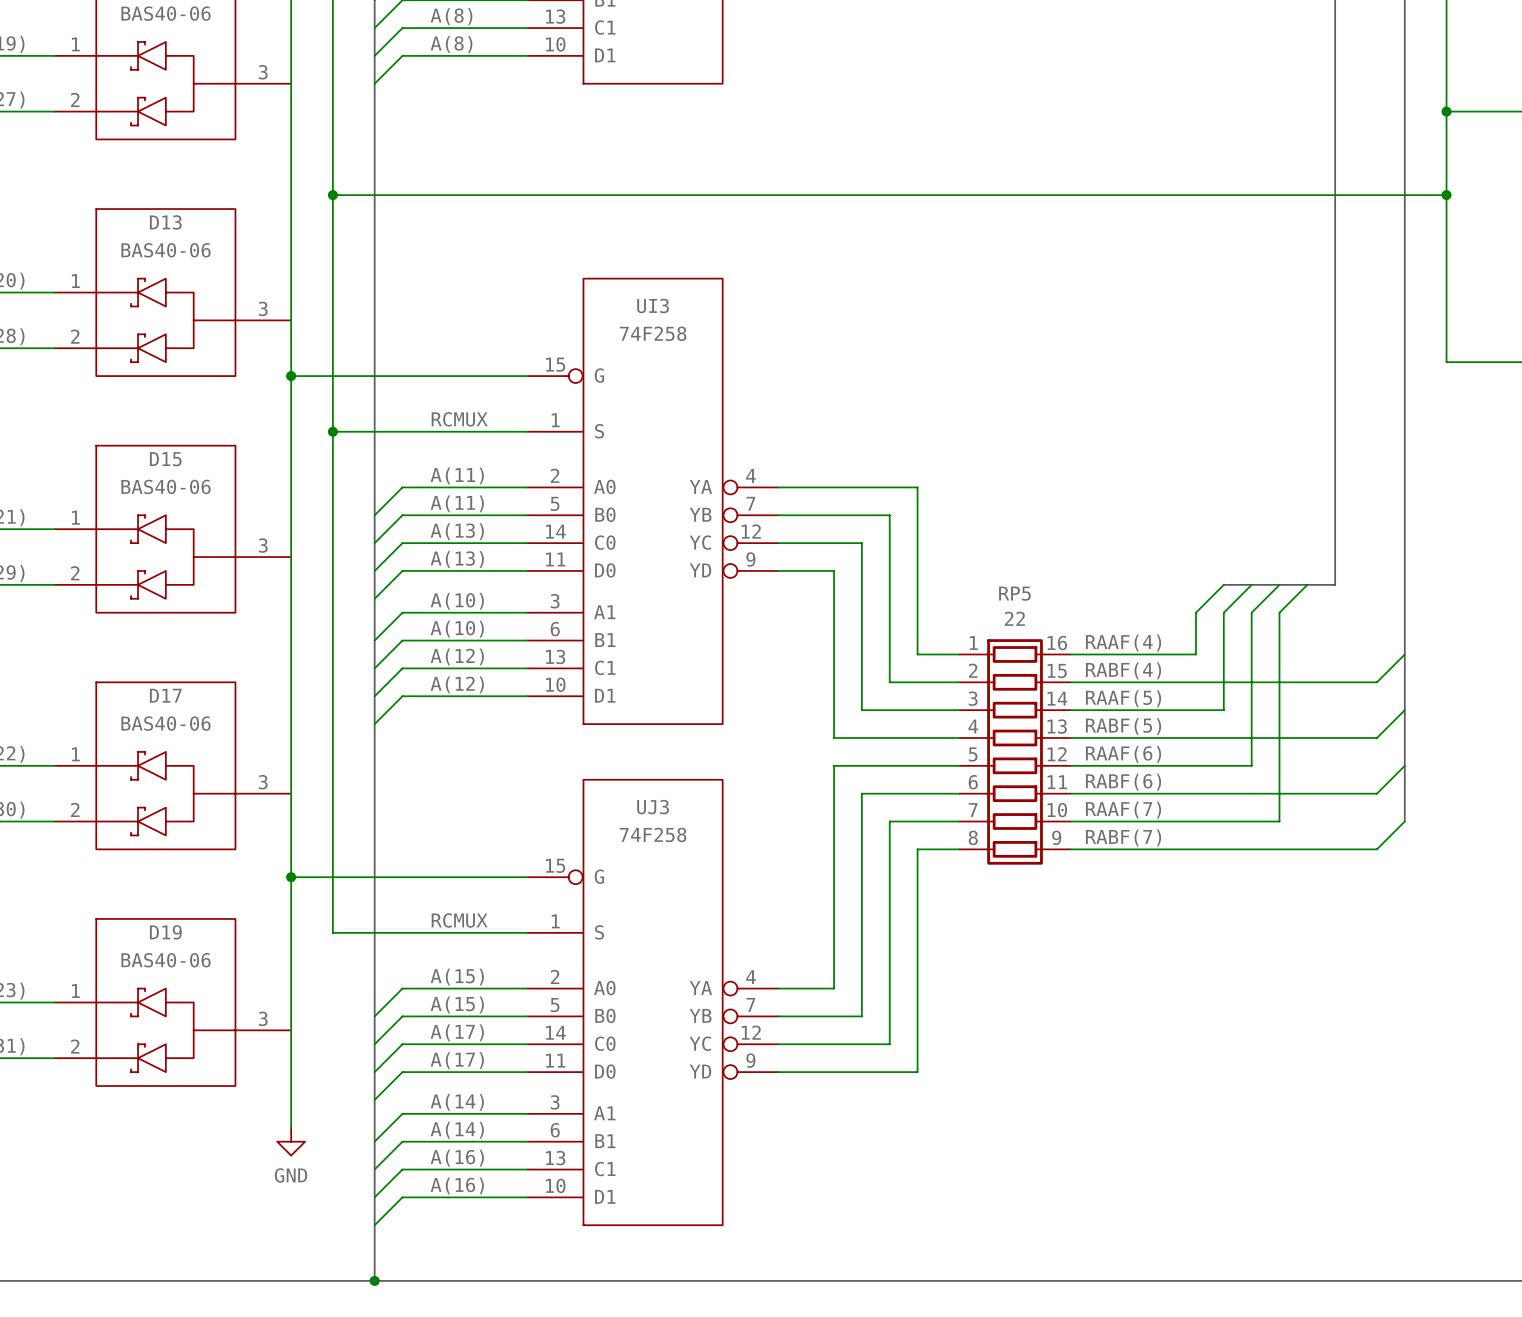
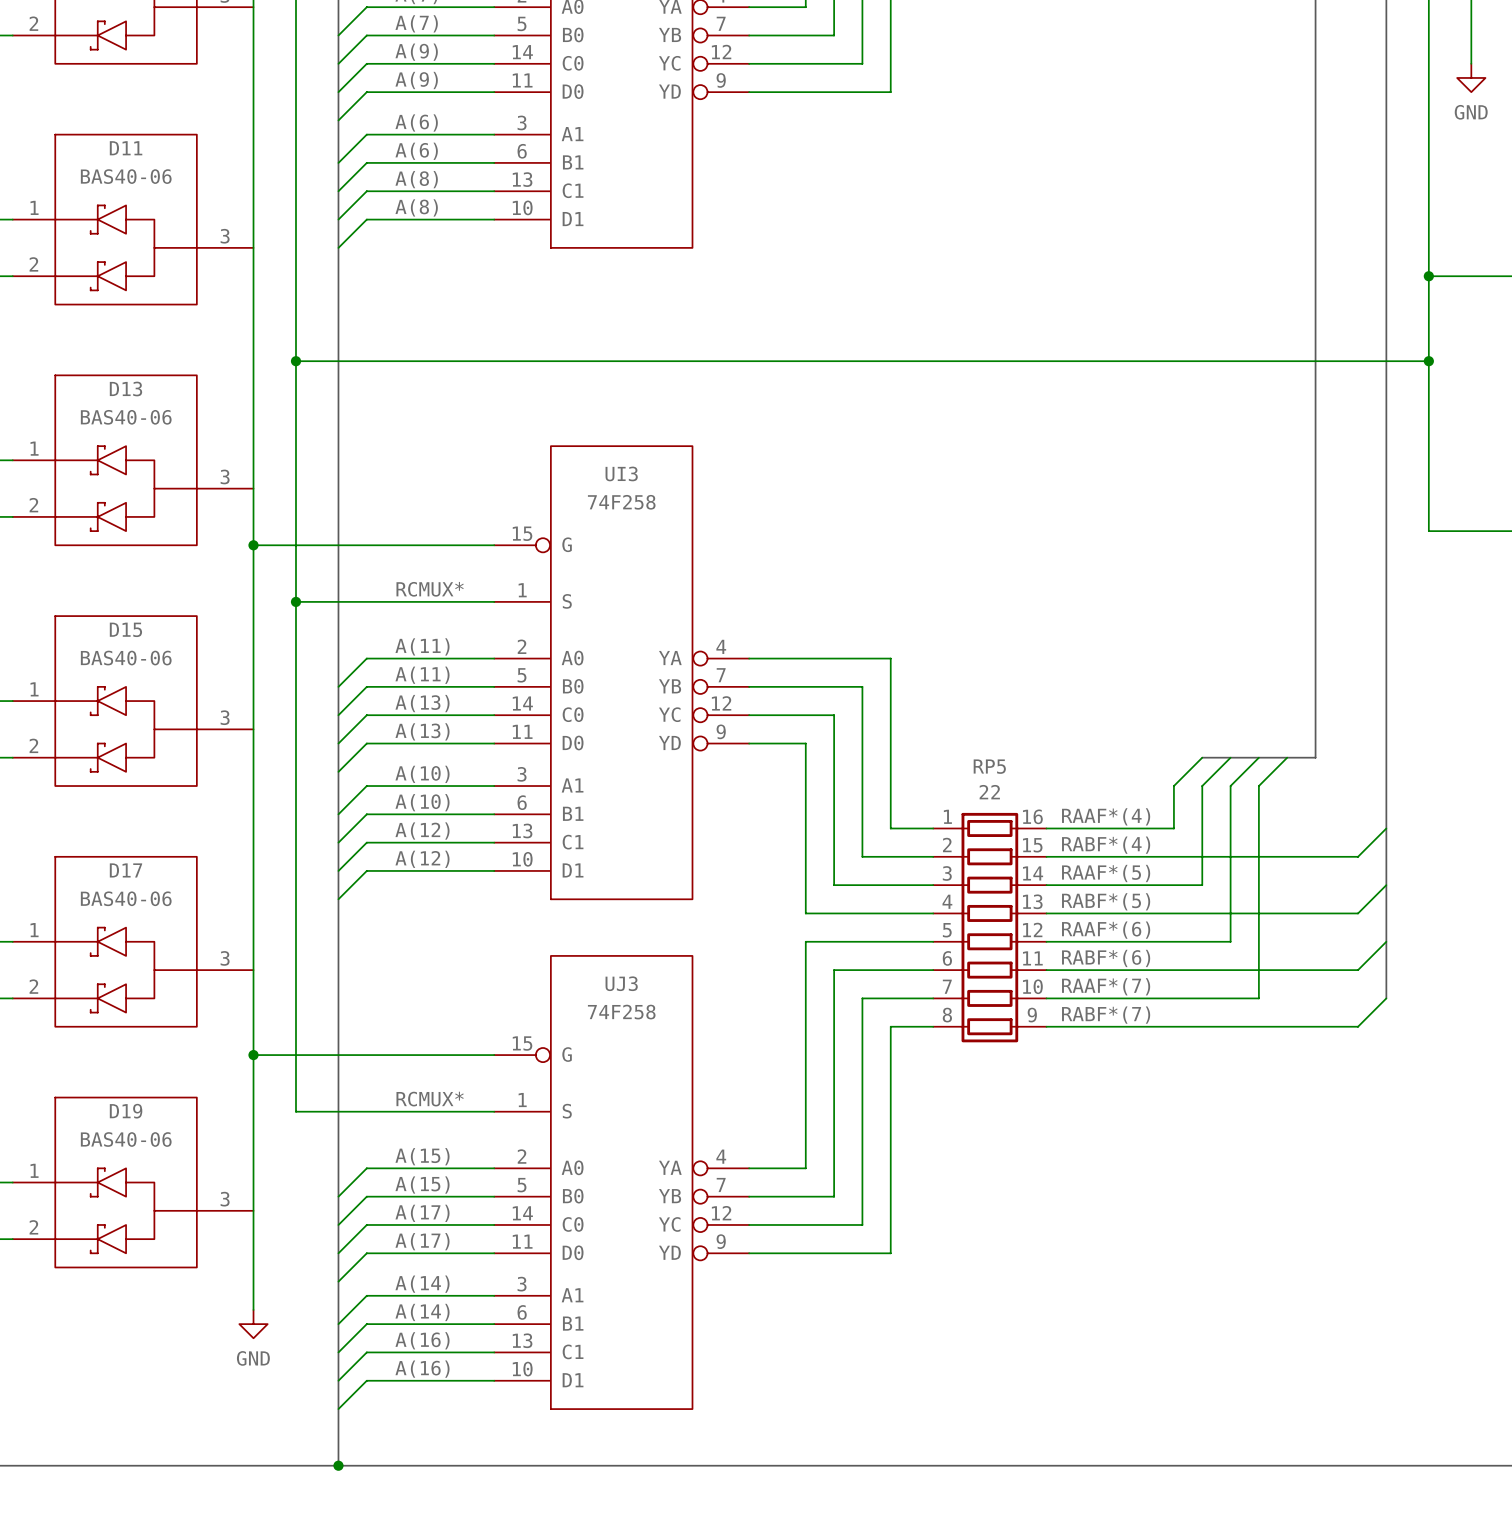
label: RCMUX (459, 419) -> RCMUX* (430, 589)
label: RAAF(4) (1123, 643) -> RAAF*(4) (1106, 816)
label: RABF(4) (1123, 670) -> RABF*(4) (1106, 845)
label: RAAF(5) (1123, 698) -> RAAF*(5) (1106, 873)
label: RABF(5) (1123, 726) -> RABF*(5) (1106, 901)
label: RAAF(6) (1123, 754) -> RAAF*(6) (1106, 930)
label: RABF(6) (1123, 782) -> RABF*(6) (1106, 958)
label: RAAF(7) (1123, 810) -> RAAF*(7) (1106, 986)
label: RABF(7) (1123, 837) -> RABF*(7) (1106, 1015)
label: RCMUX (459, 920) -> RCMUX* (430, 1099)

